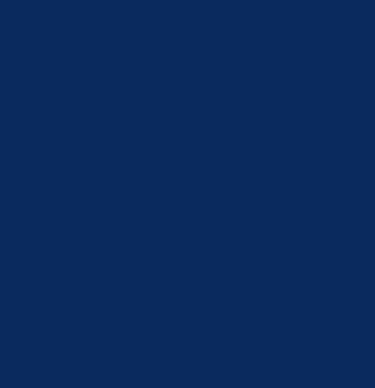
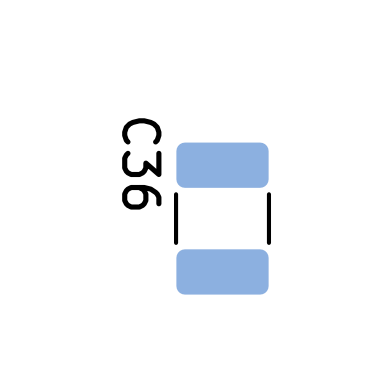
C36: none -> (222, 218)

